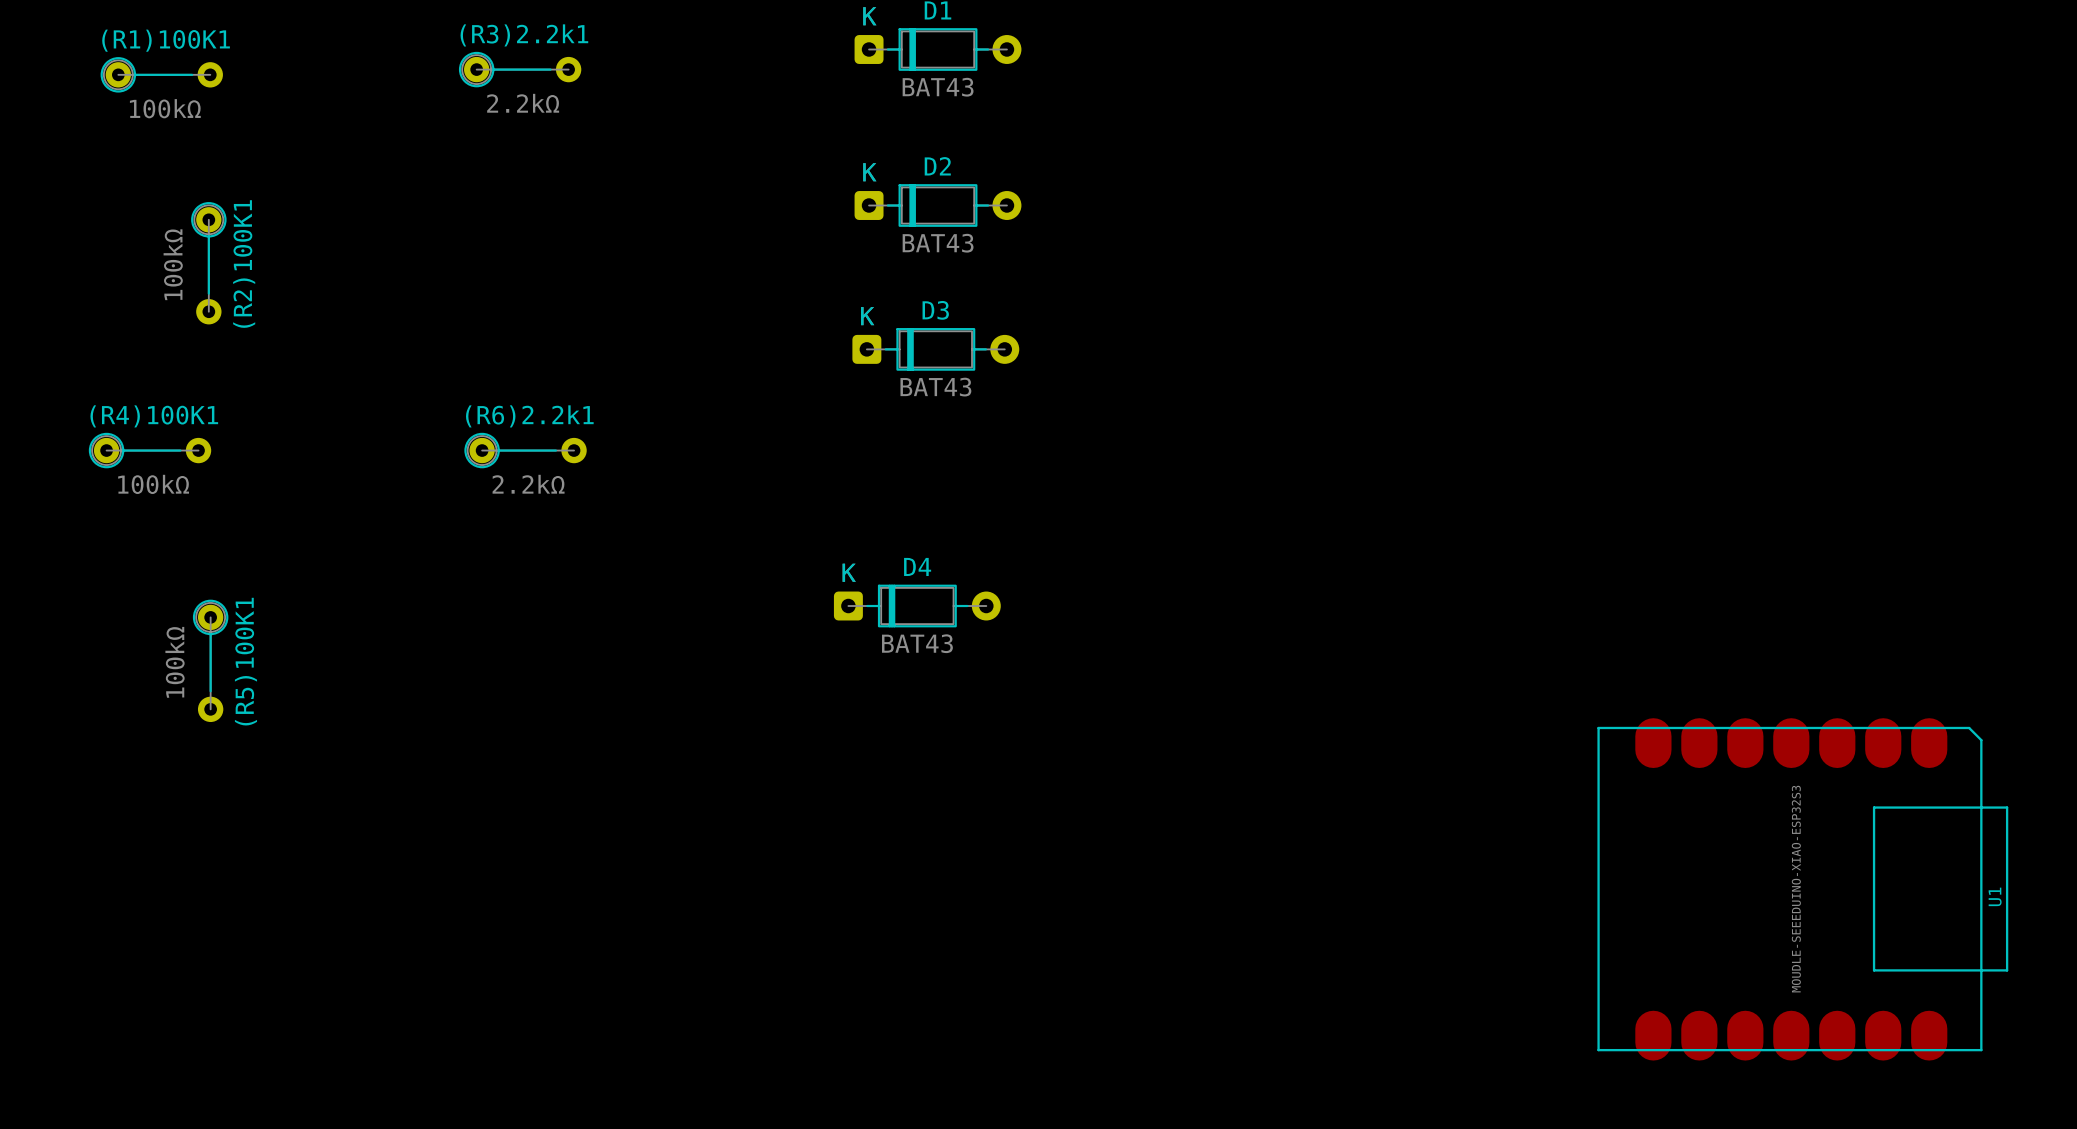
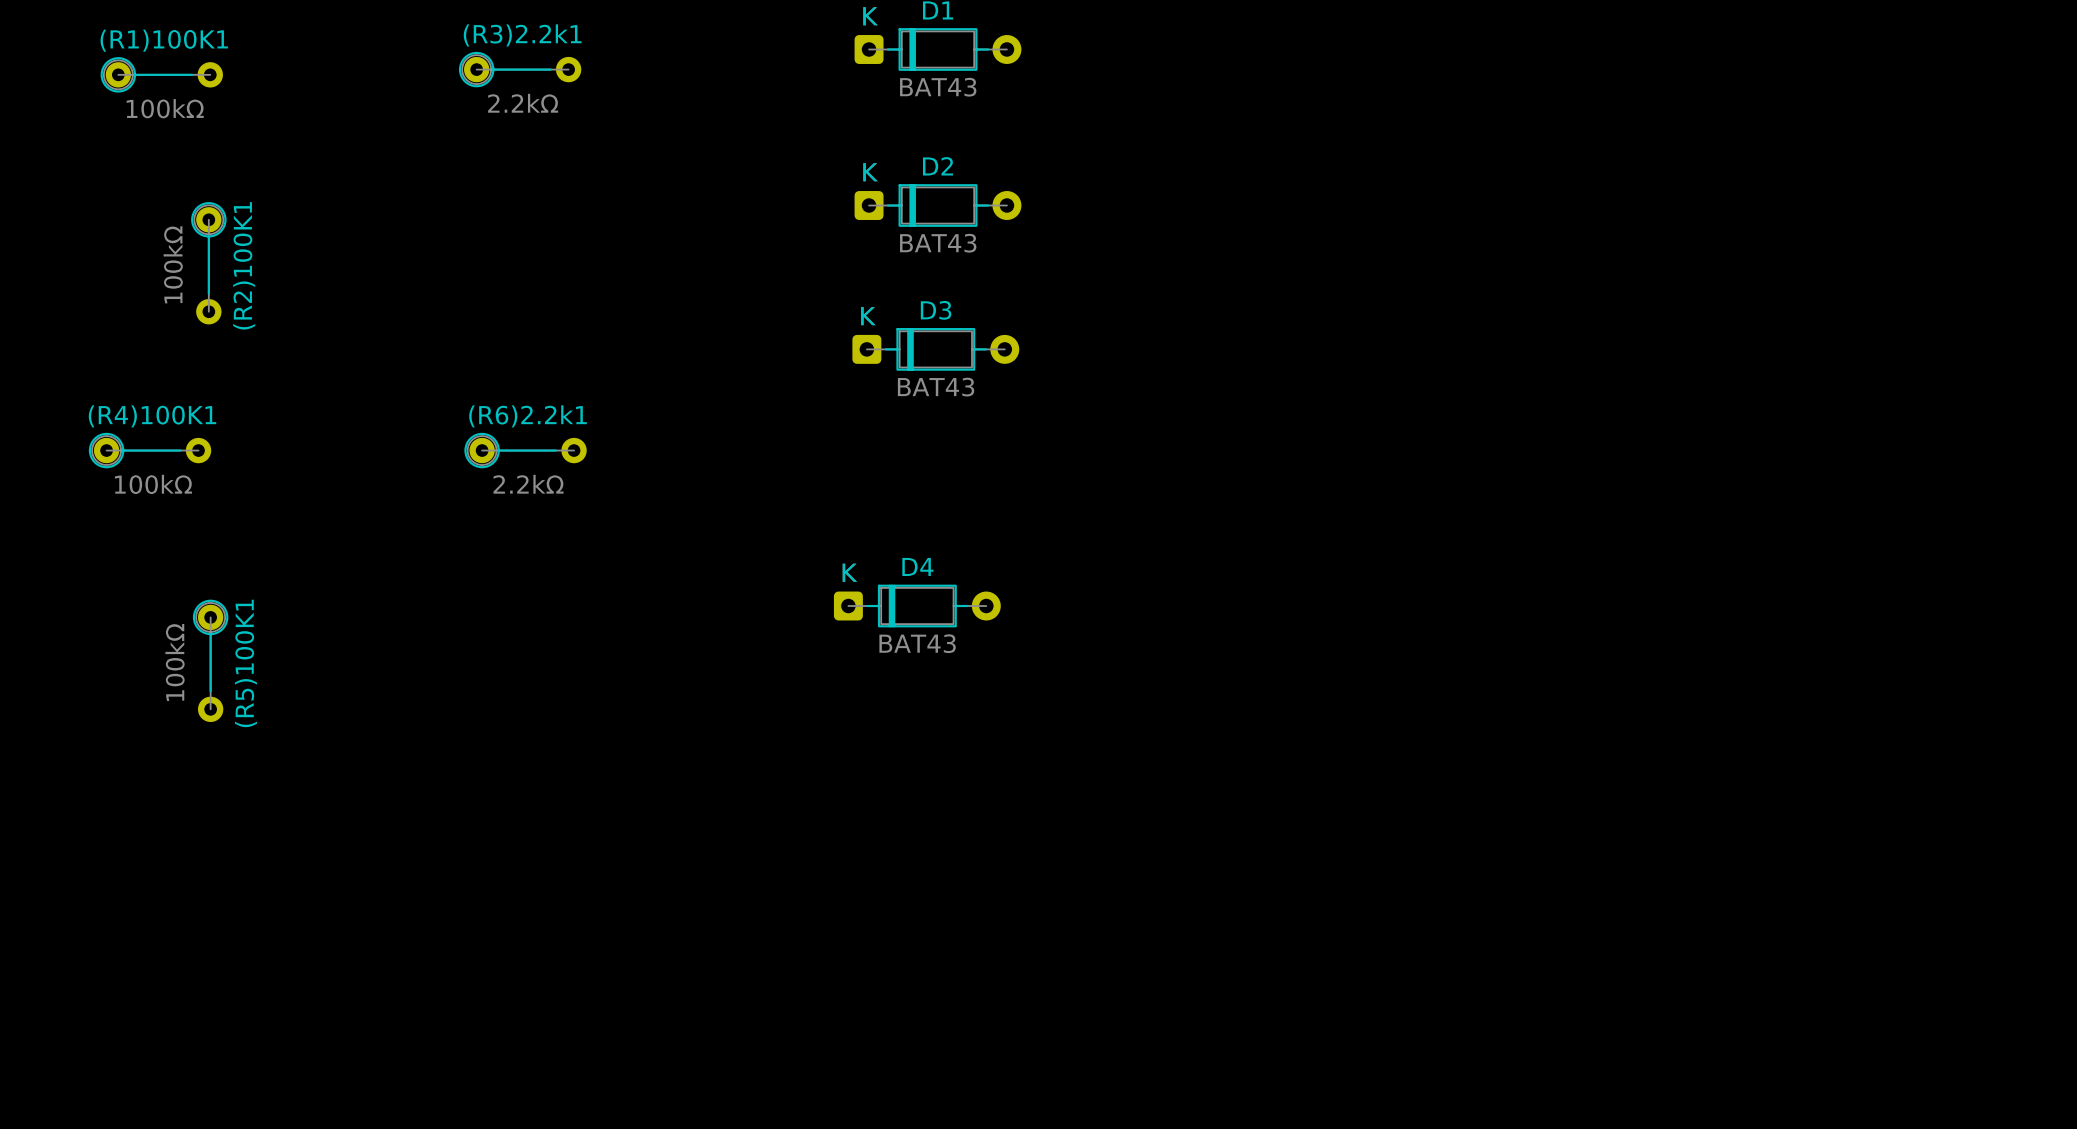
U1: MOUDLE-SEEEDUINO-XIAO-ESP32S3 (1802, 889) -> none

